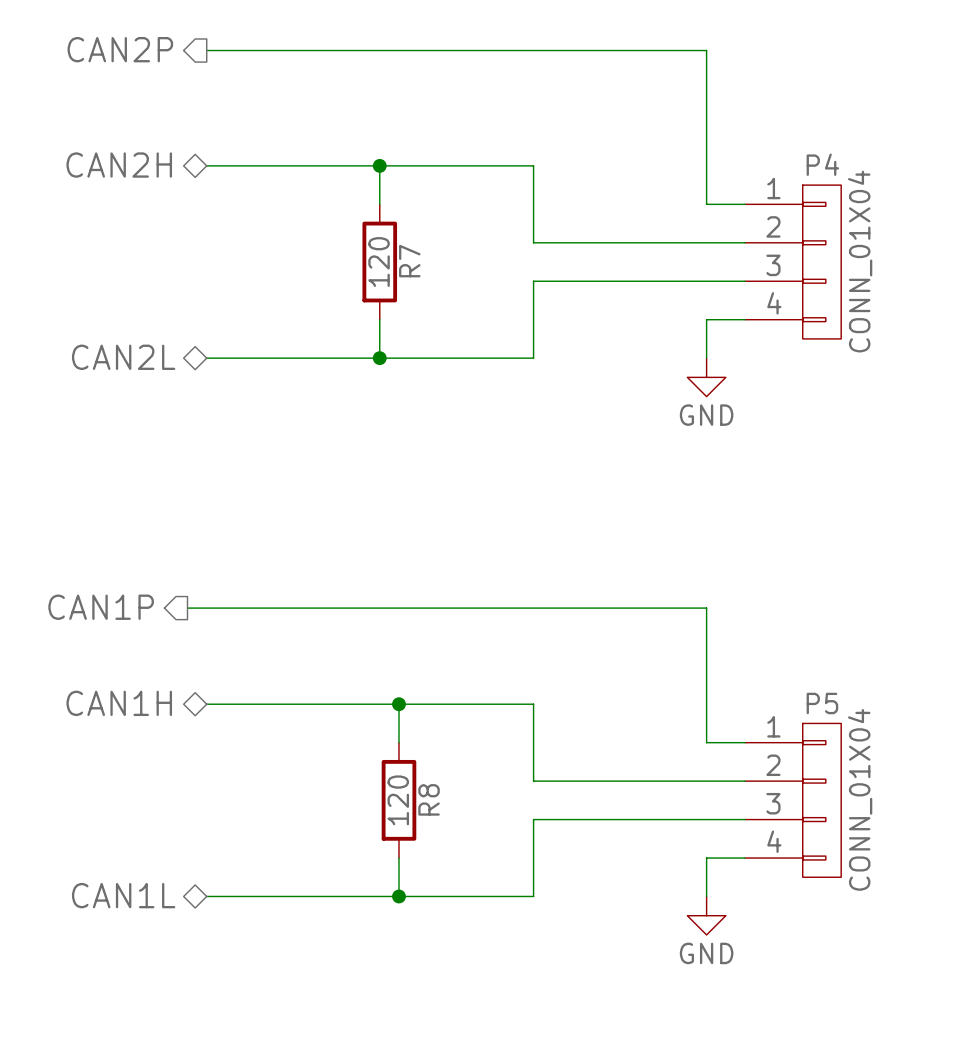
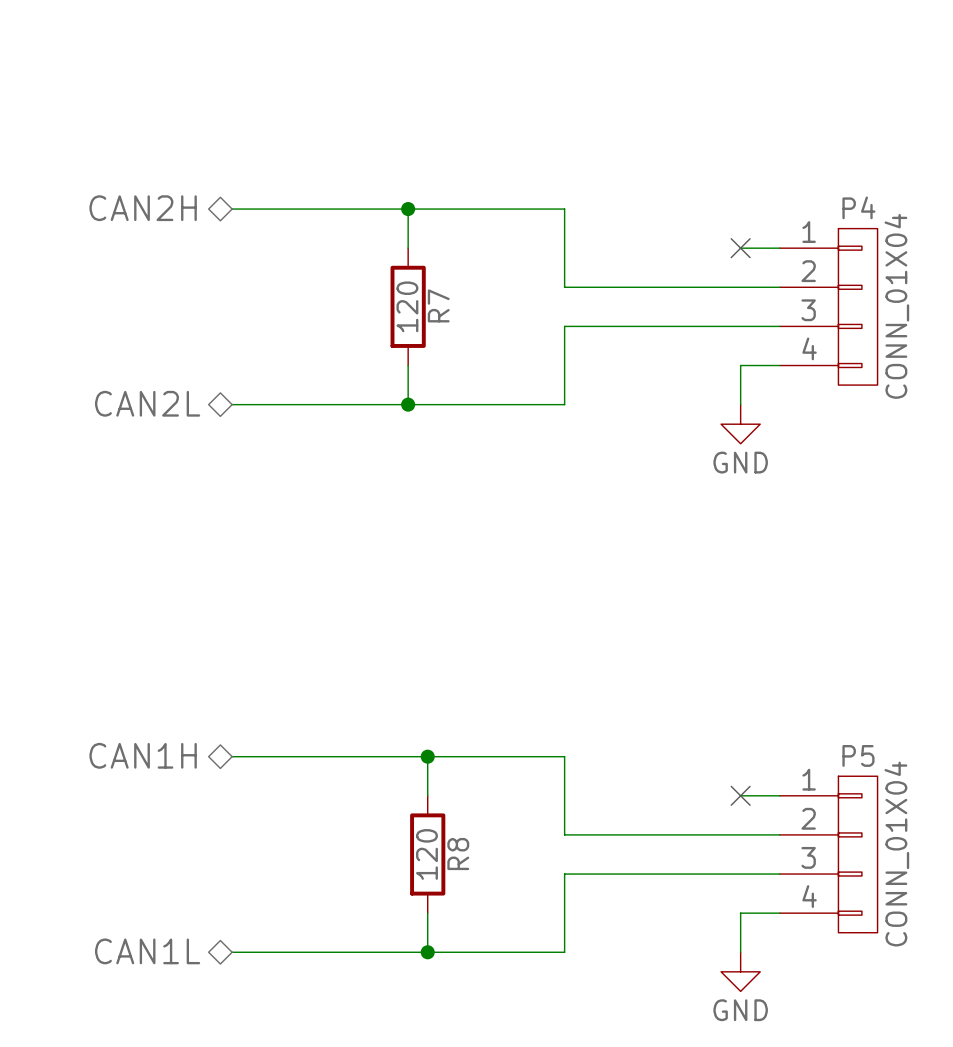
hierarchical label: CAN2P (120, 49) -> none
wire: (206, 50) (706, 50) (706, 204) -> none
no-connect mark: none -> (740, 248)
hierarchical label: CAN1P (101, 607) -> none
wire: (187, 608) (706, 608) (706, 742) -> none
no-connect mark: none -> (740, 795)

